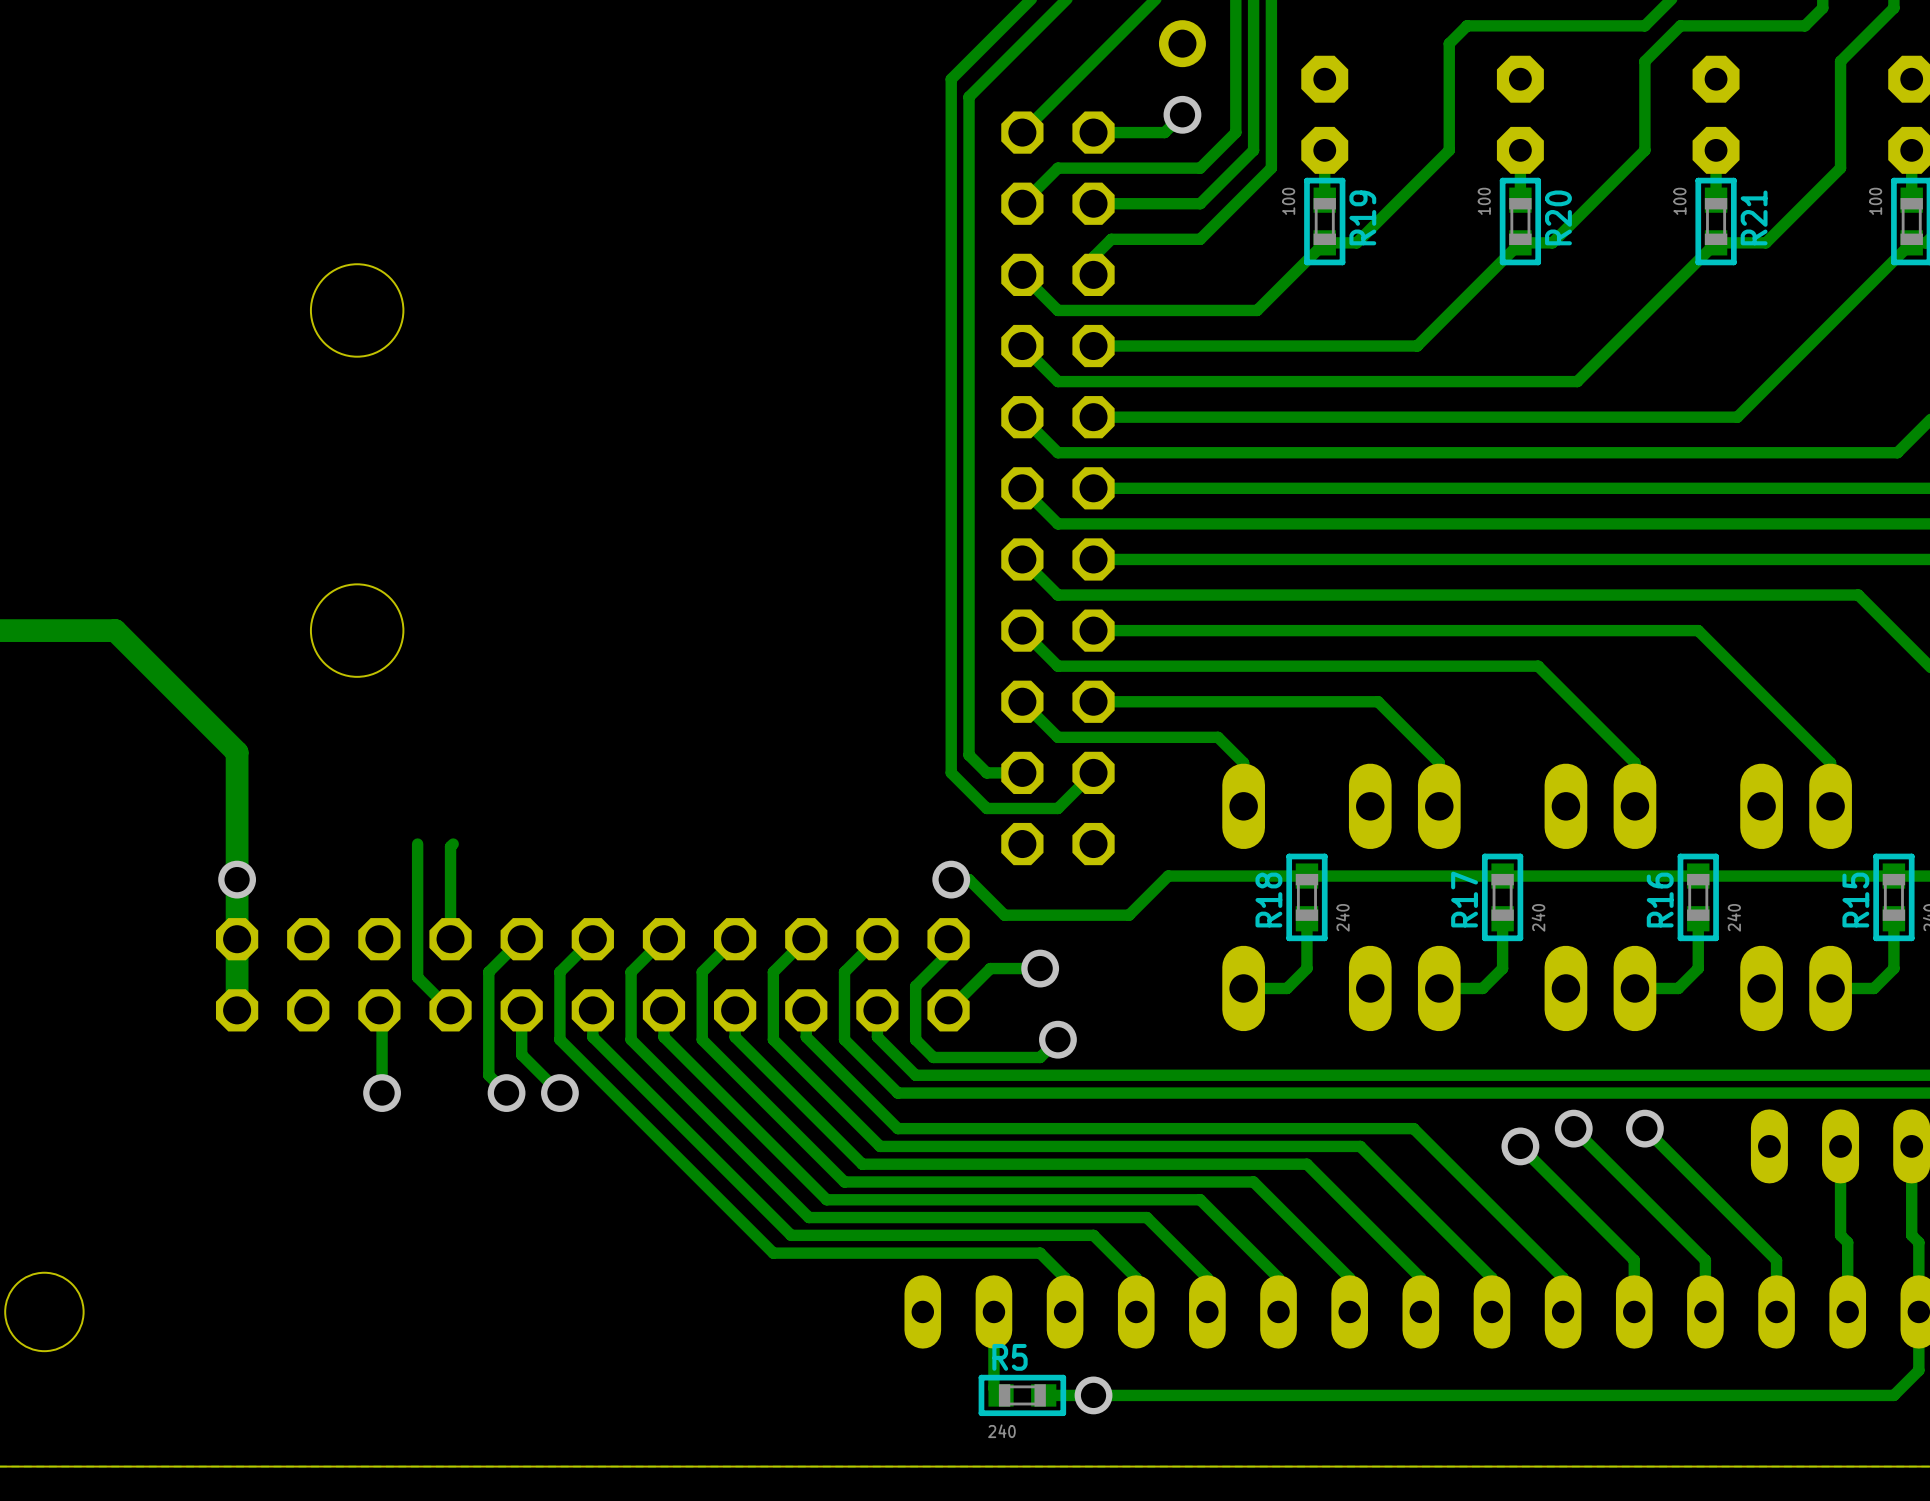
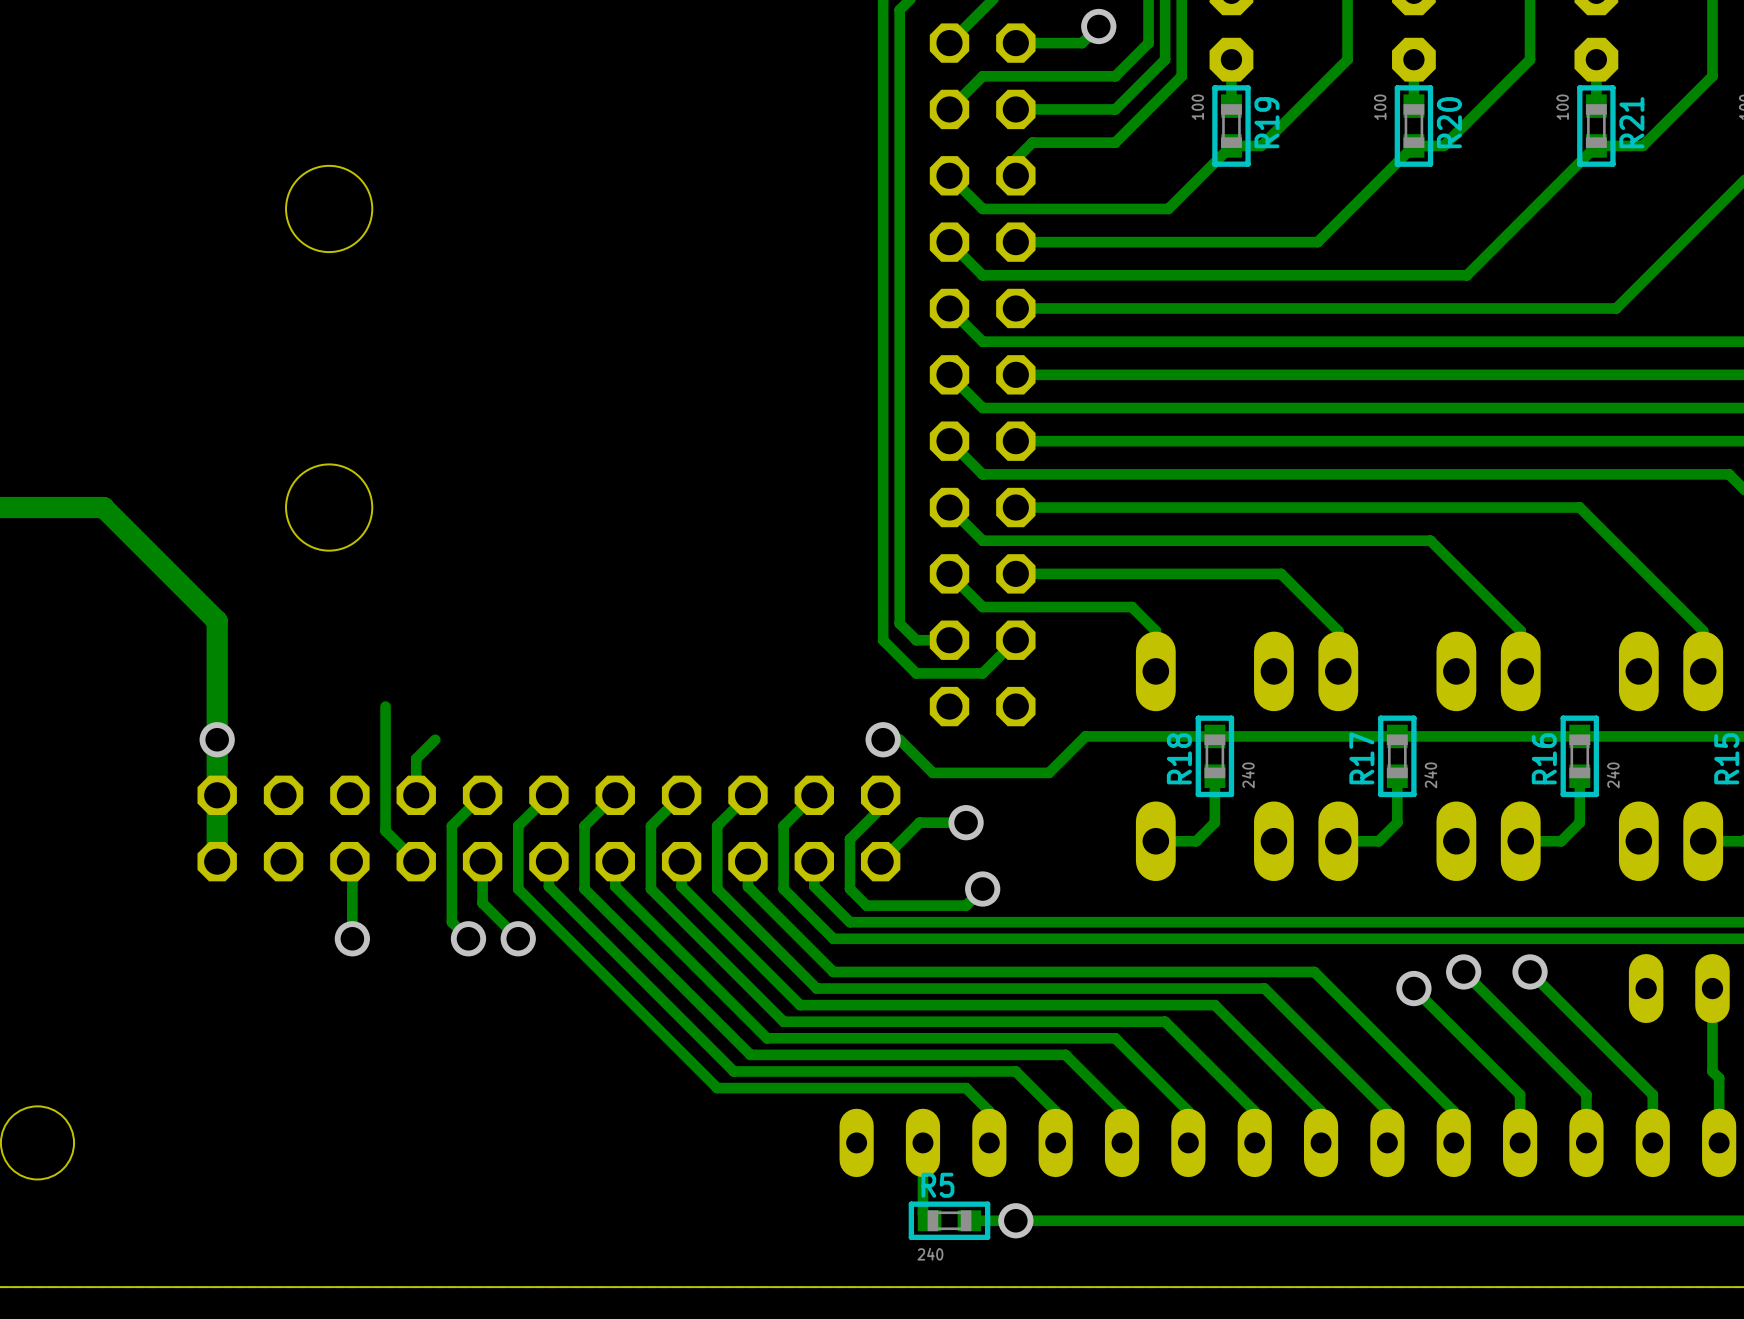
track: (453, 844) (450, 846) (450, 900) -> (435, 739) (416, 758)

